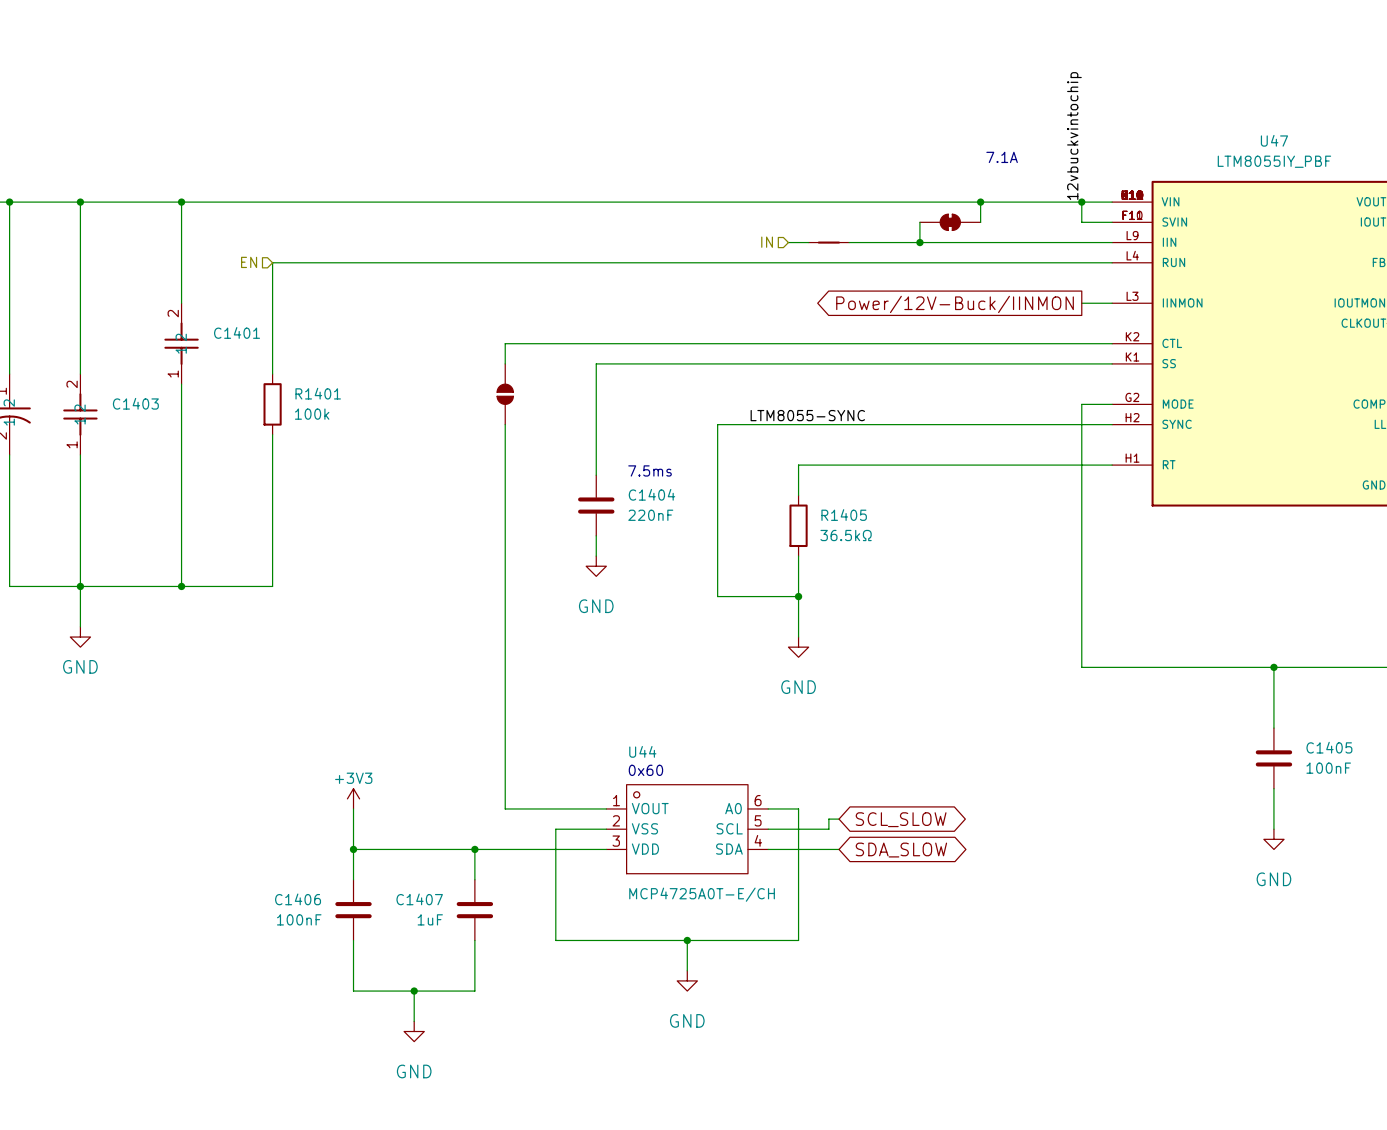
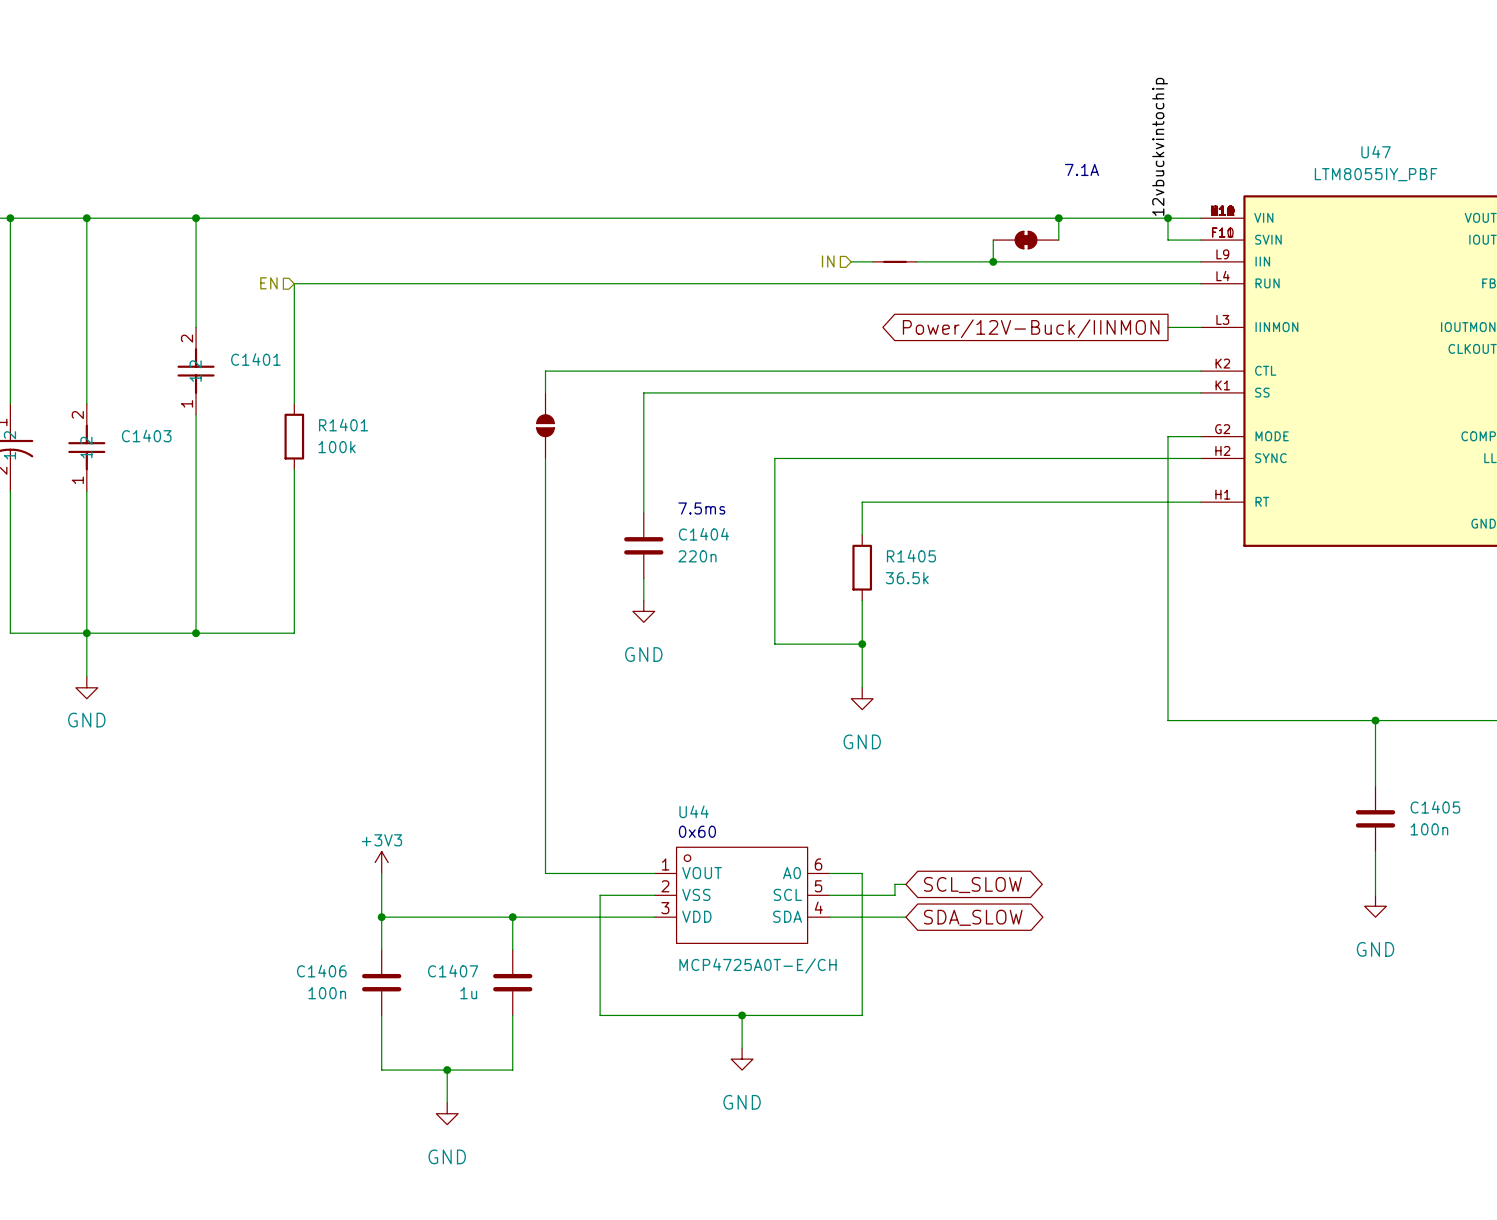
label: LTM8055-SYNC (807, 415) -> none
C1404 value: 220nF (650, 515) -> 220n (697, 556)
R1405 value: 36.5kΩ (846, 535) -> 36.5k (907, 578)
C1405 value: 100nF (1328, 768) -> 100n (1429, 829)
C1406 value: 100nF (299, 919) -> 100n (327, 993)
C1407 value: 1uF (430, 919) -> 1u (468, 993)

